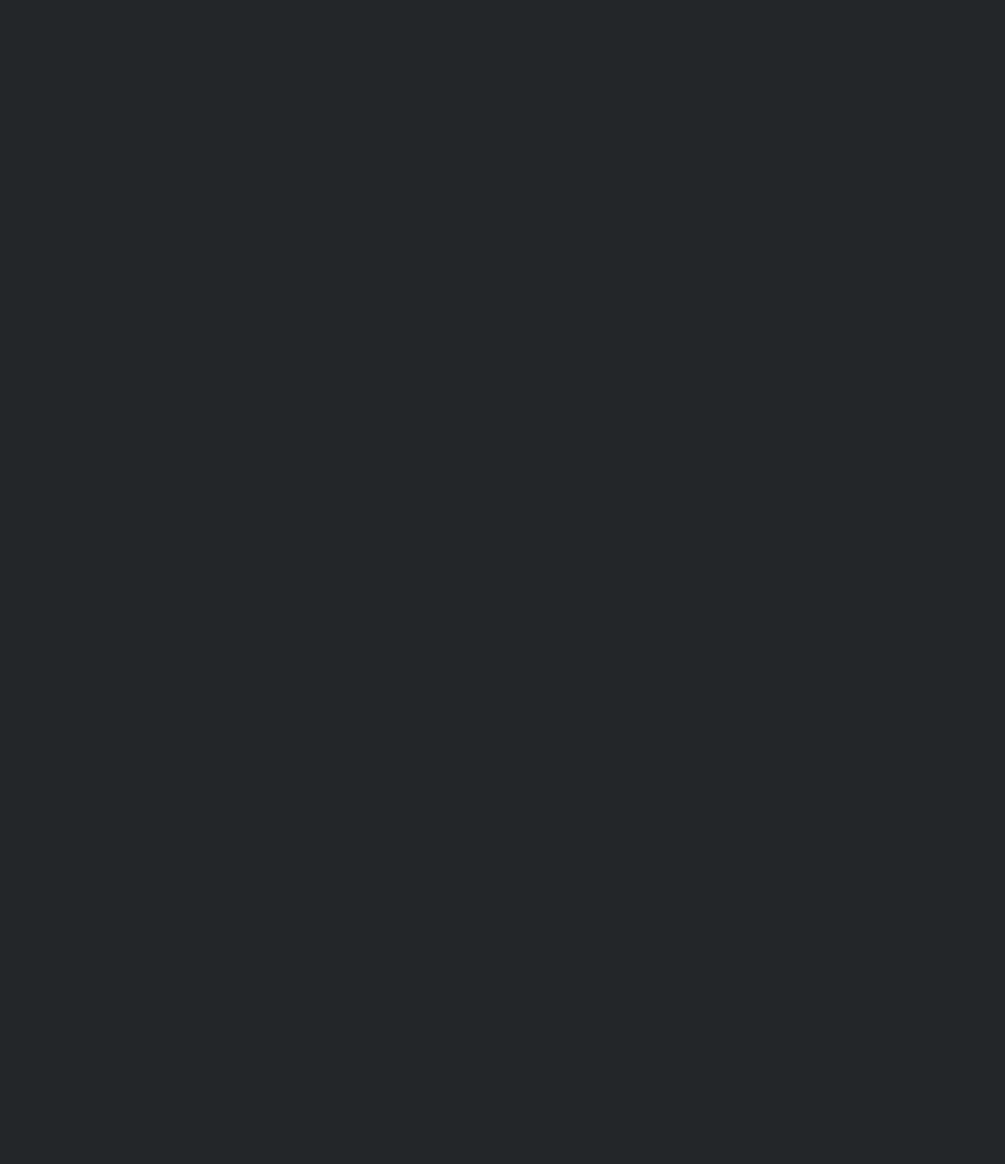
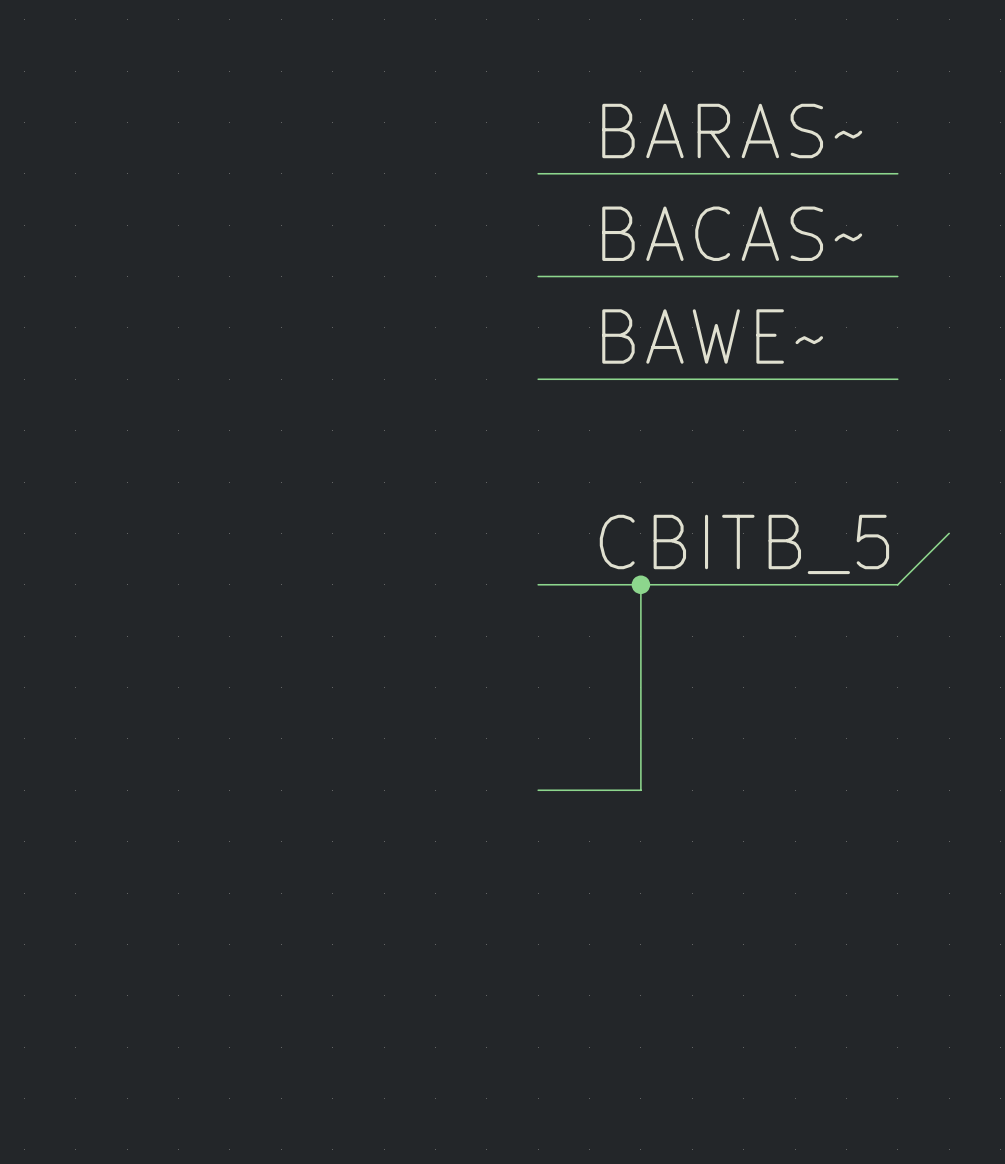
label: none -> BARAS~ (732, 130)
wire: none -> (538, 173) (897, 173)
label: none -> BACAS~ (732, 233)
wire: none -> (538, 276) (897, 276)
label: none -> BAWE~ (712, 336)
wire: none -> (538, 379) (897, 379)
wire: none -> (949, 533) (897, 584) (538, 584)
label: none -> CBITB_5 (744, 544)
wire: none -> (640, 584) (640, 790) (538, 790)
junction: none -> (640, 584)

